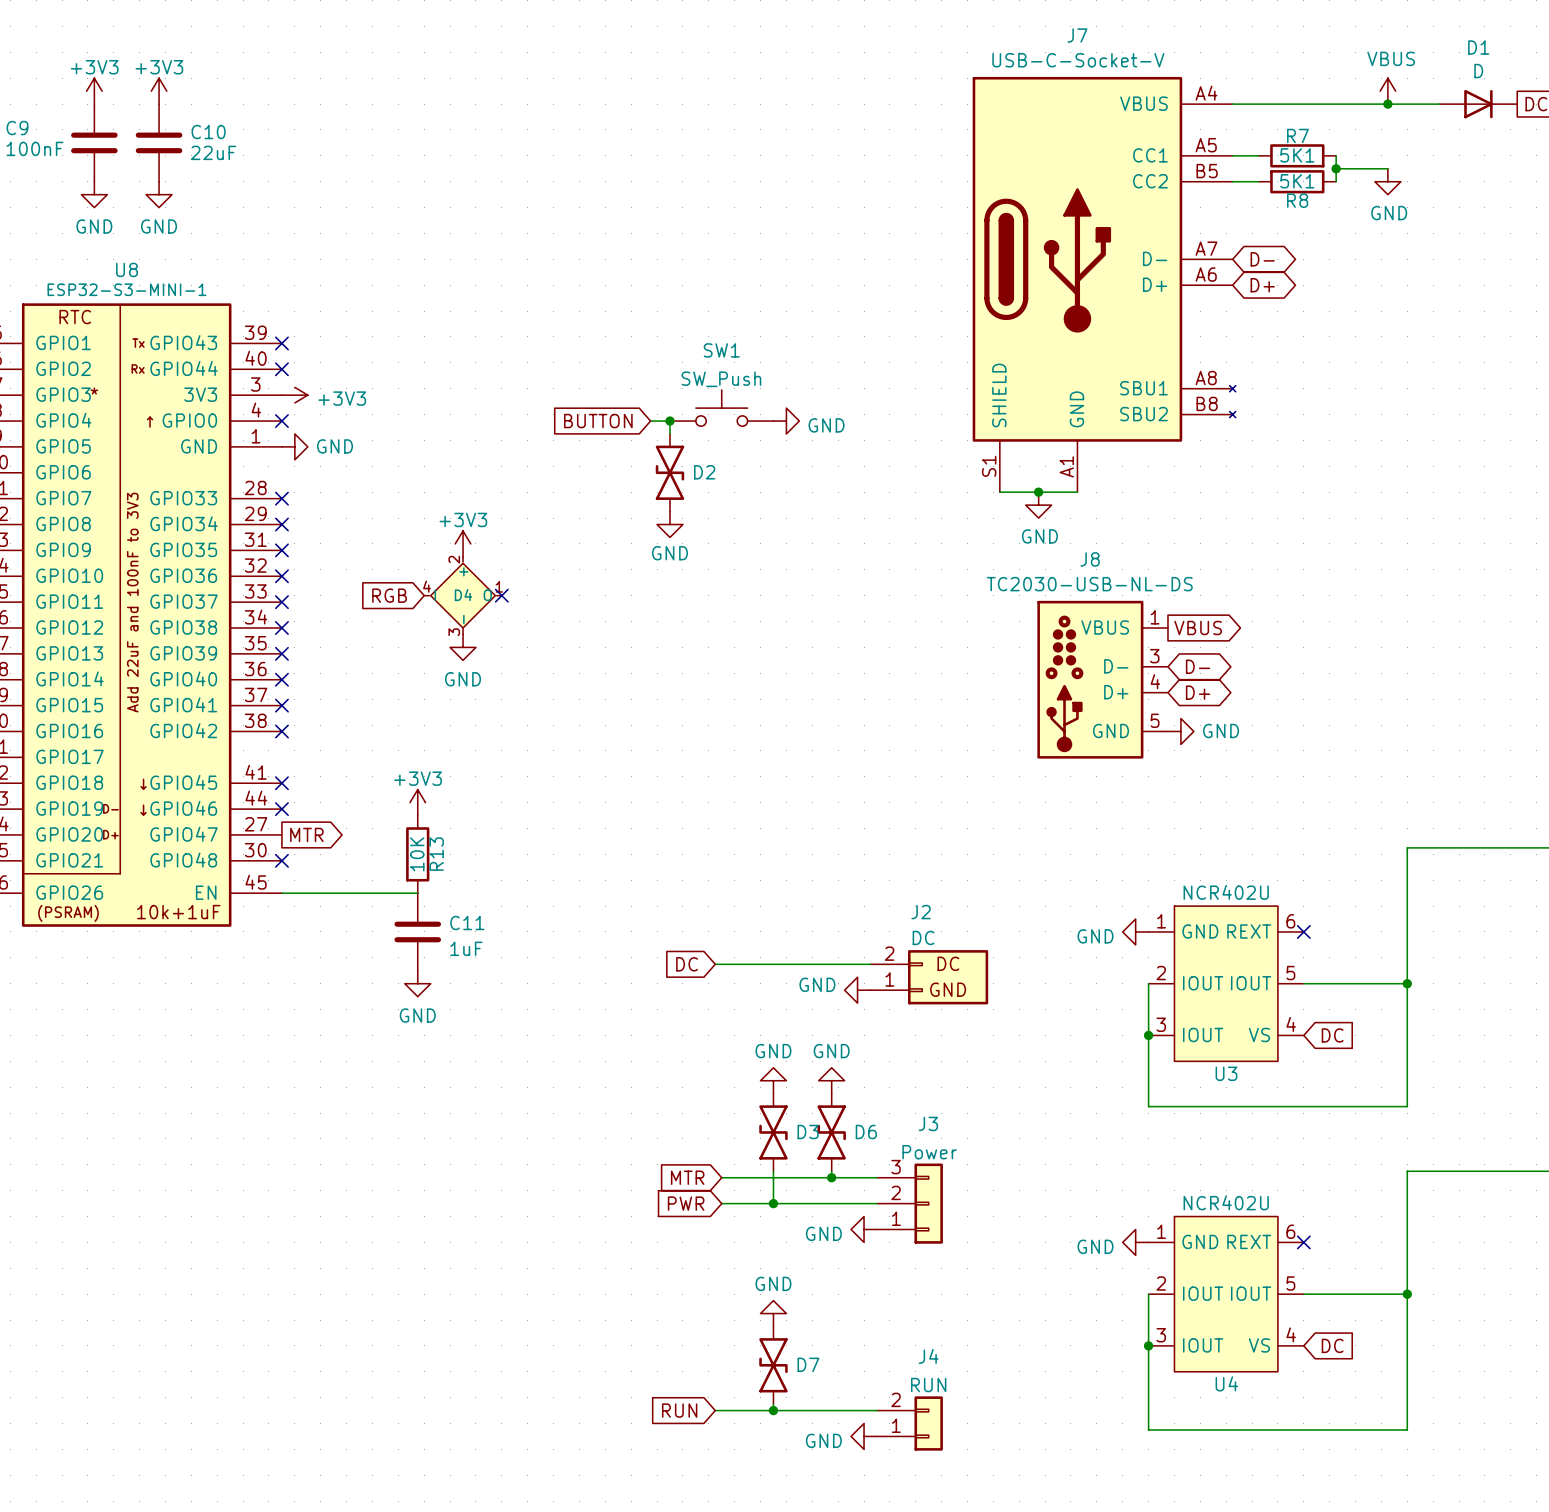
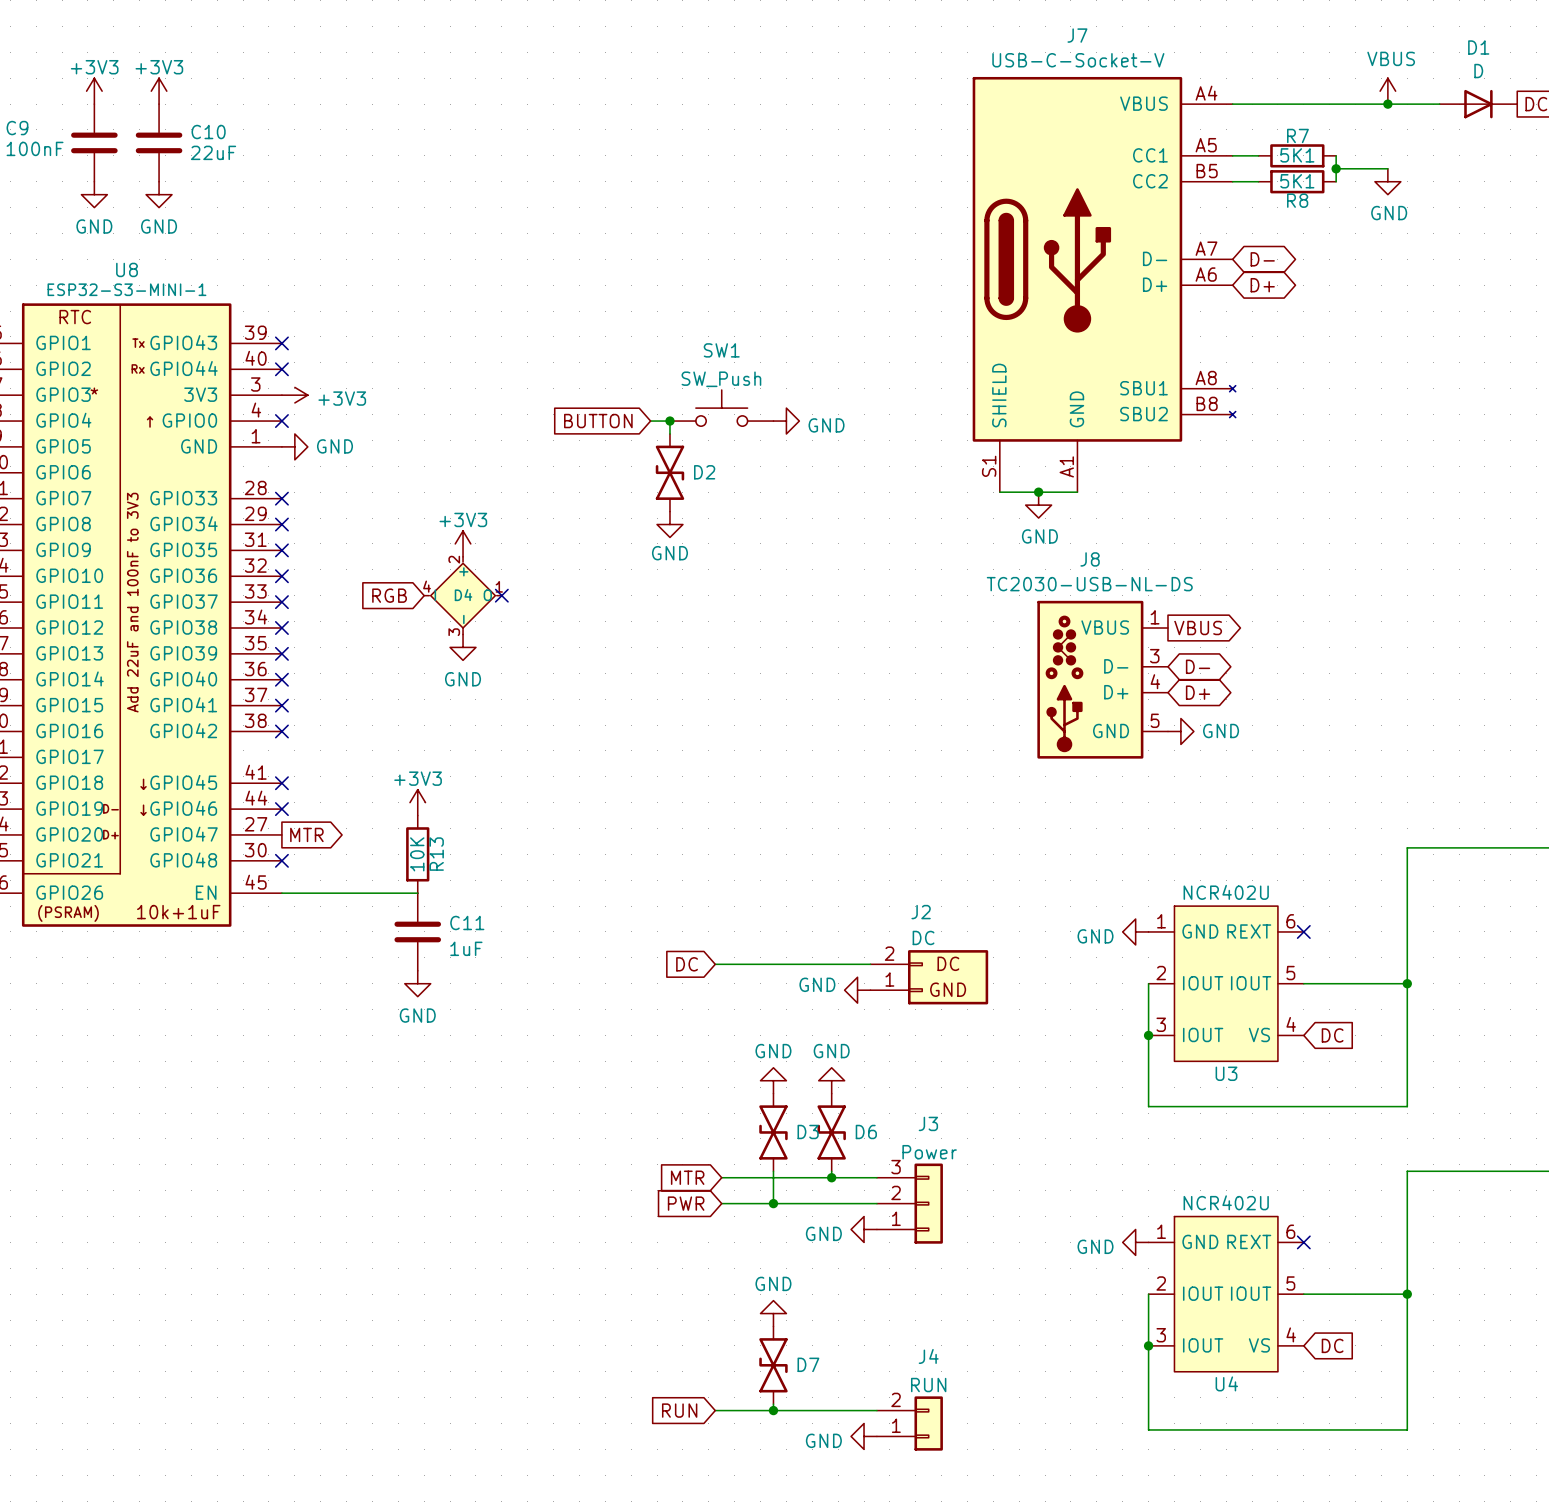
J8 symbol: [1037, 600, 1168, 759] -> [1037, 600, 1168, 759]

